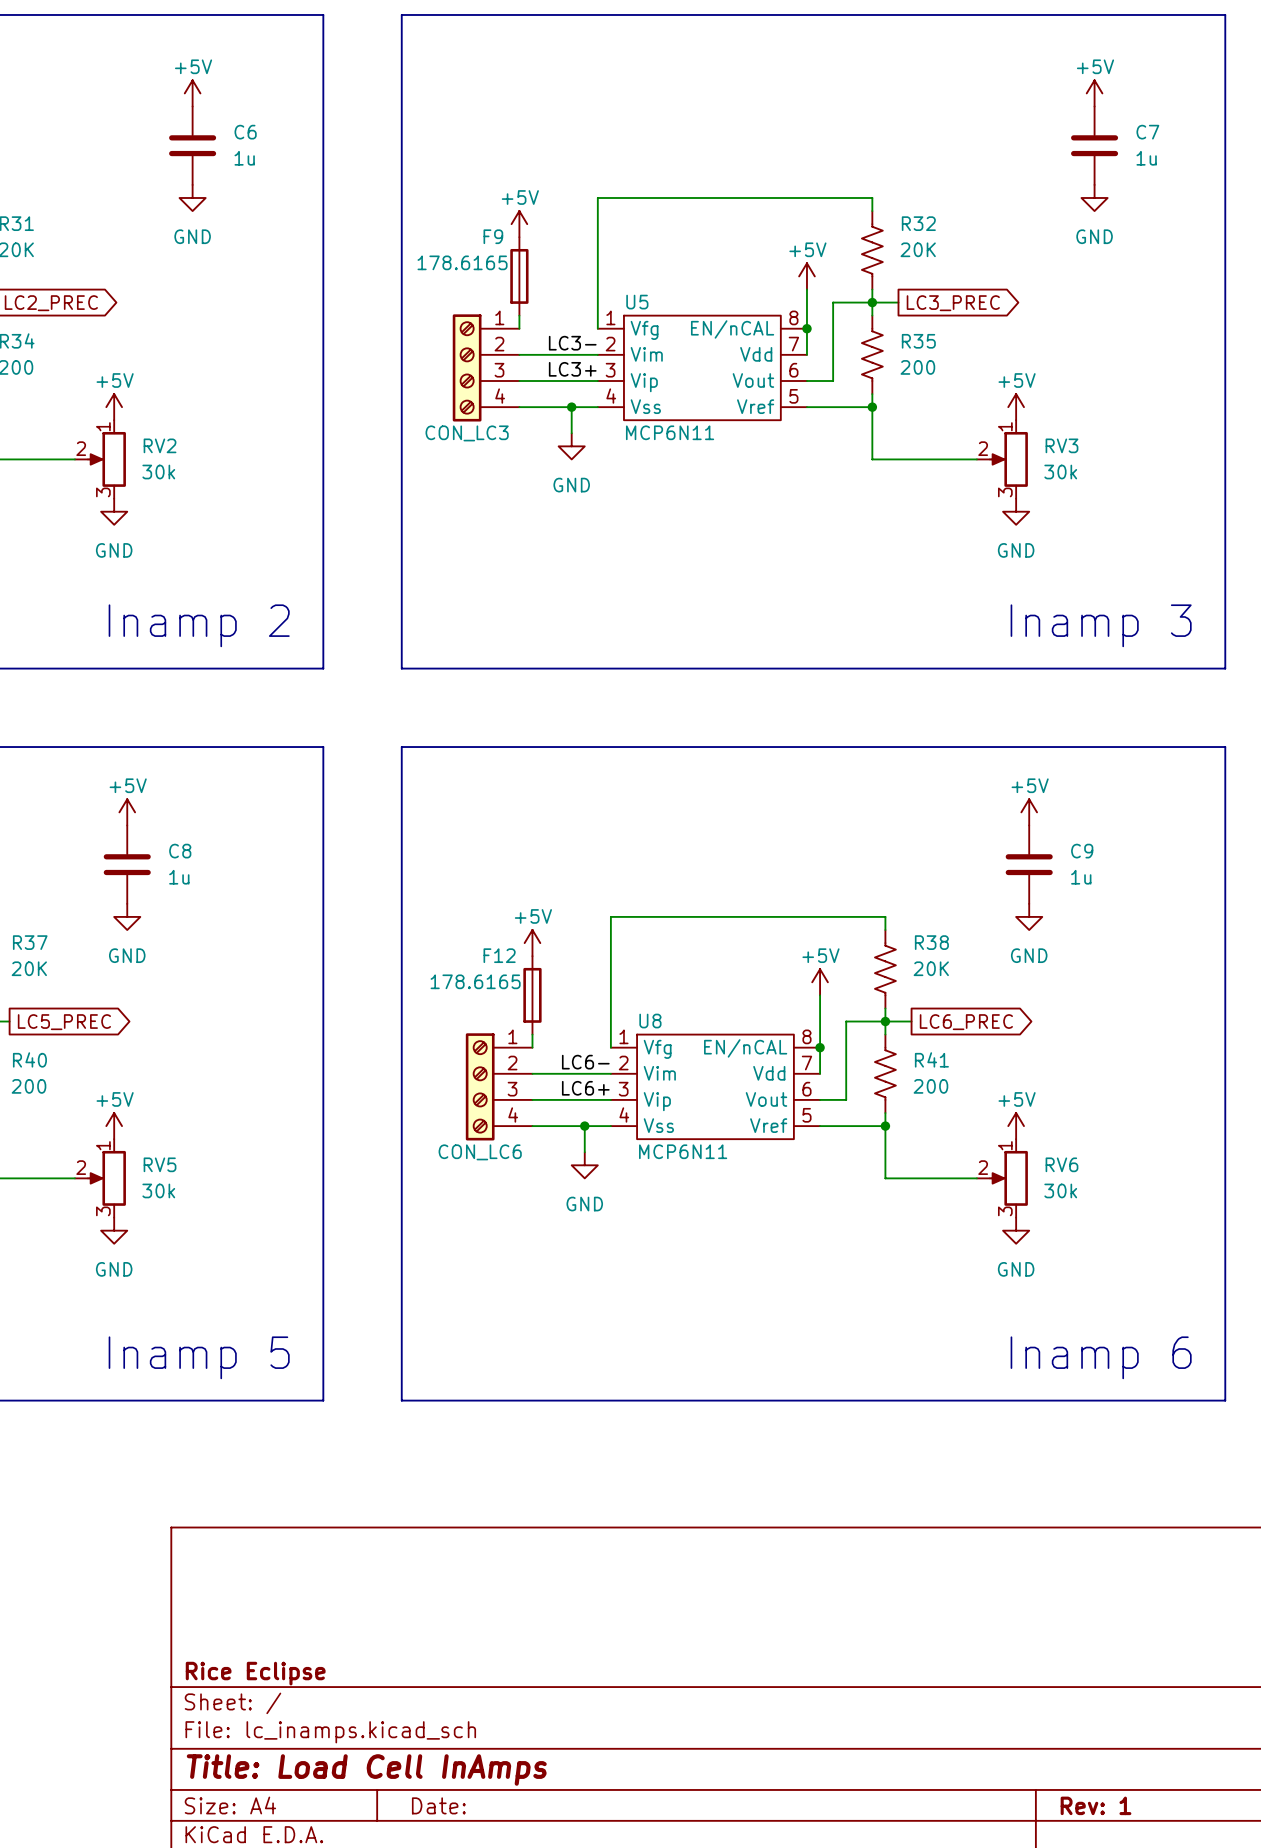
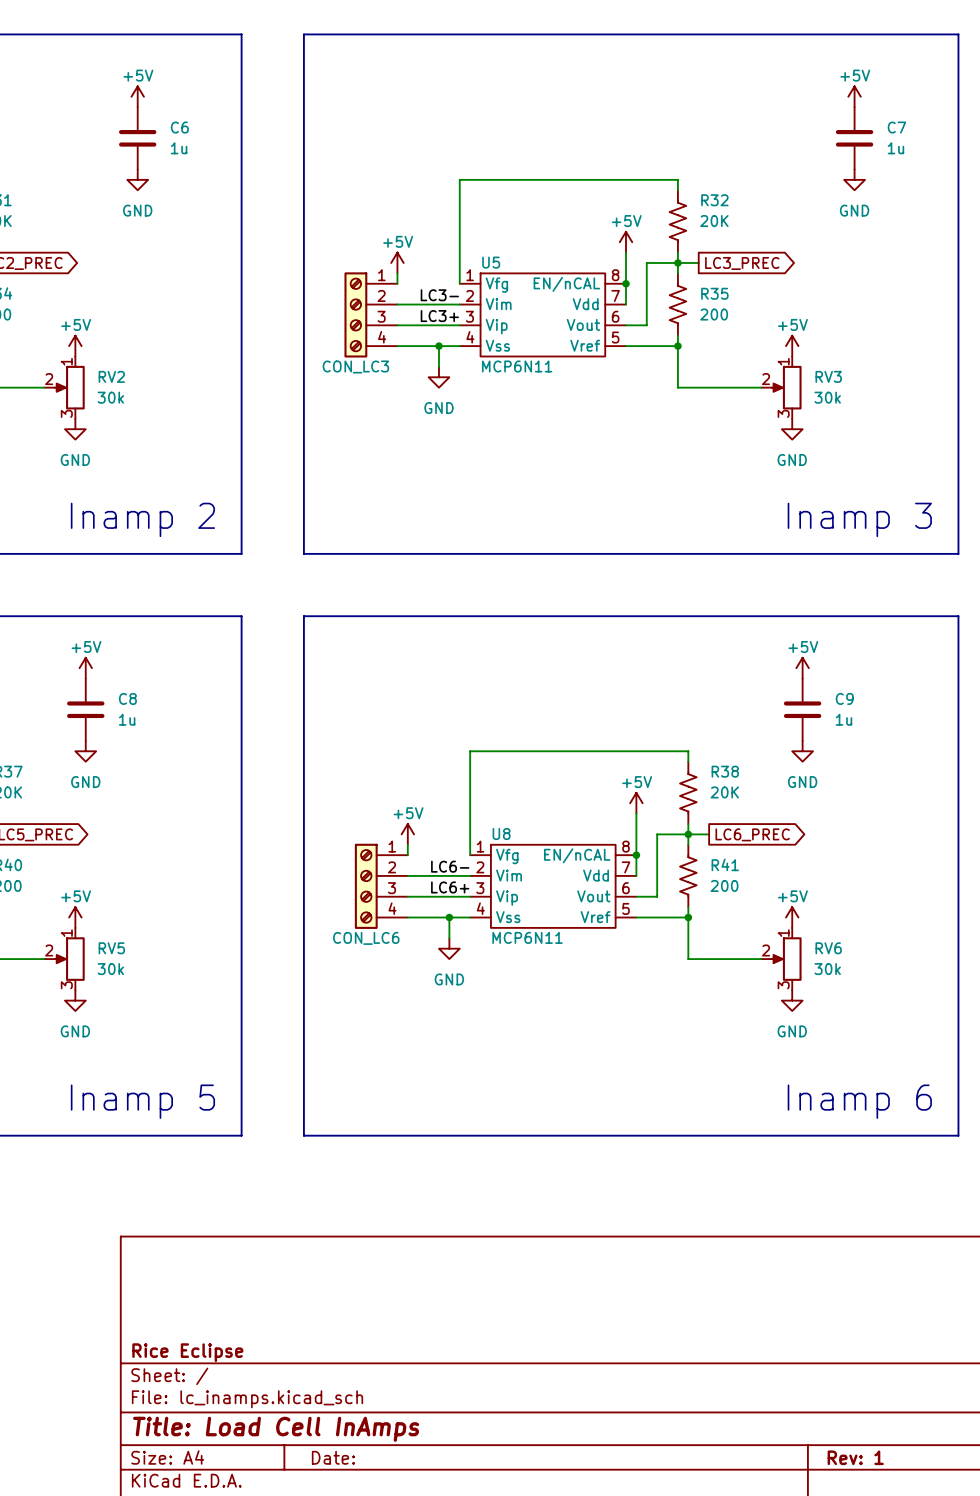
power symbol position: +5V (519, 224) -> +5V (397, 262)
F9: 178.6165 (519, 276) -> none
power symbol position: +5V (532, 943) -> +5V (407, 834)
F12: 178.6165 (532, 995) -> none

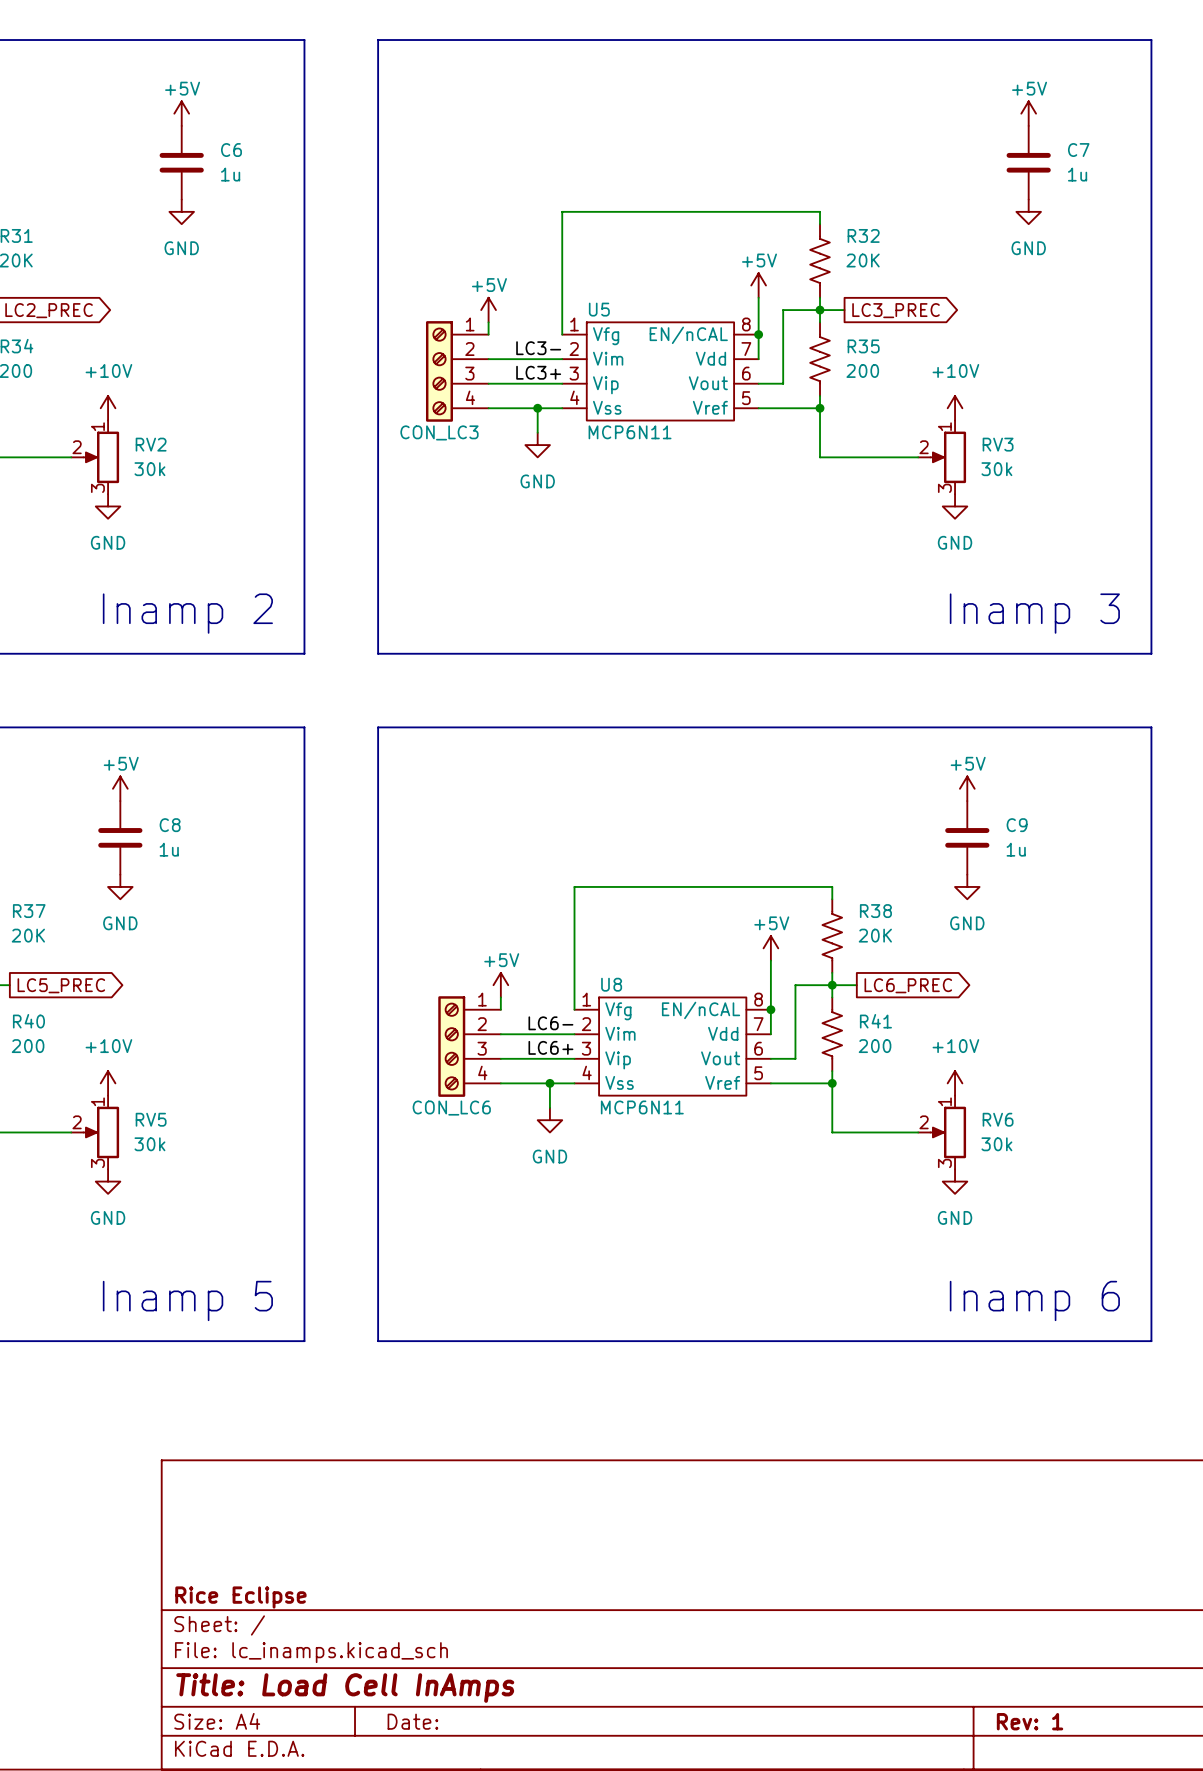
power symbol: +5V (75, 346) -> +10V (108, 408)
power symbol: +5V (792, 346) -> +10V (955, 408)
power symbol: +5V (75, 917) -> +10V (108, 1083)
power symbol: +5V (792, 917) -> +10V (955, 1083)

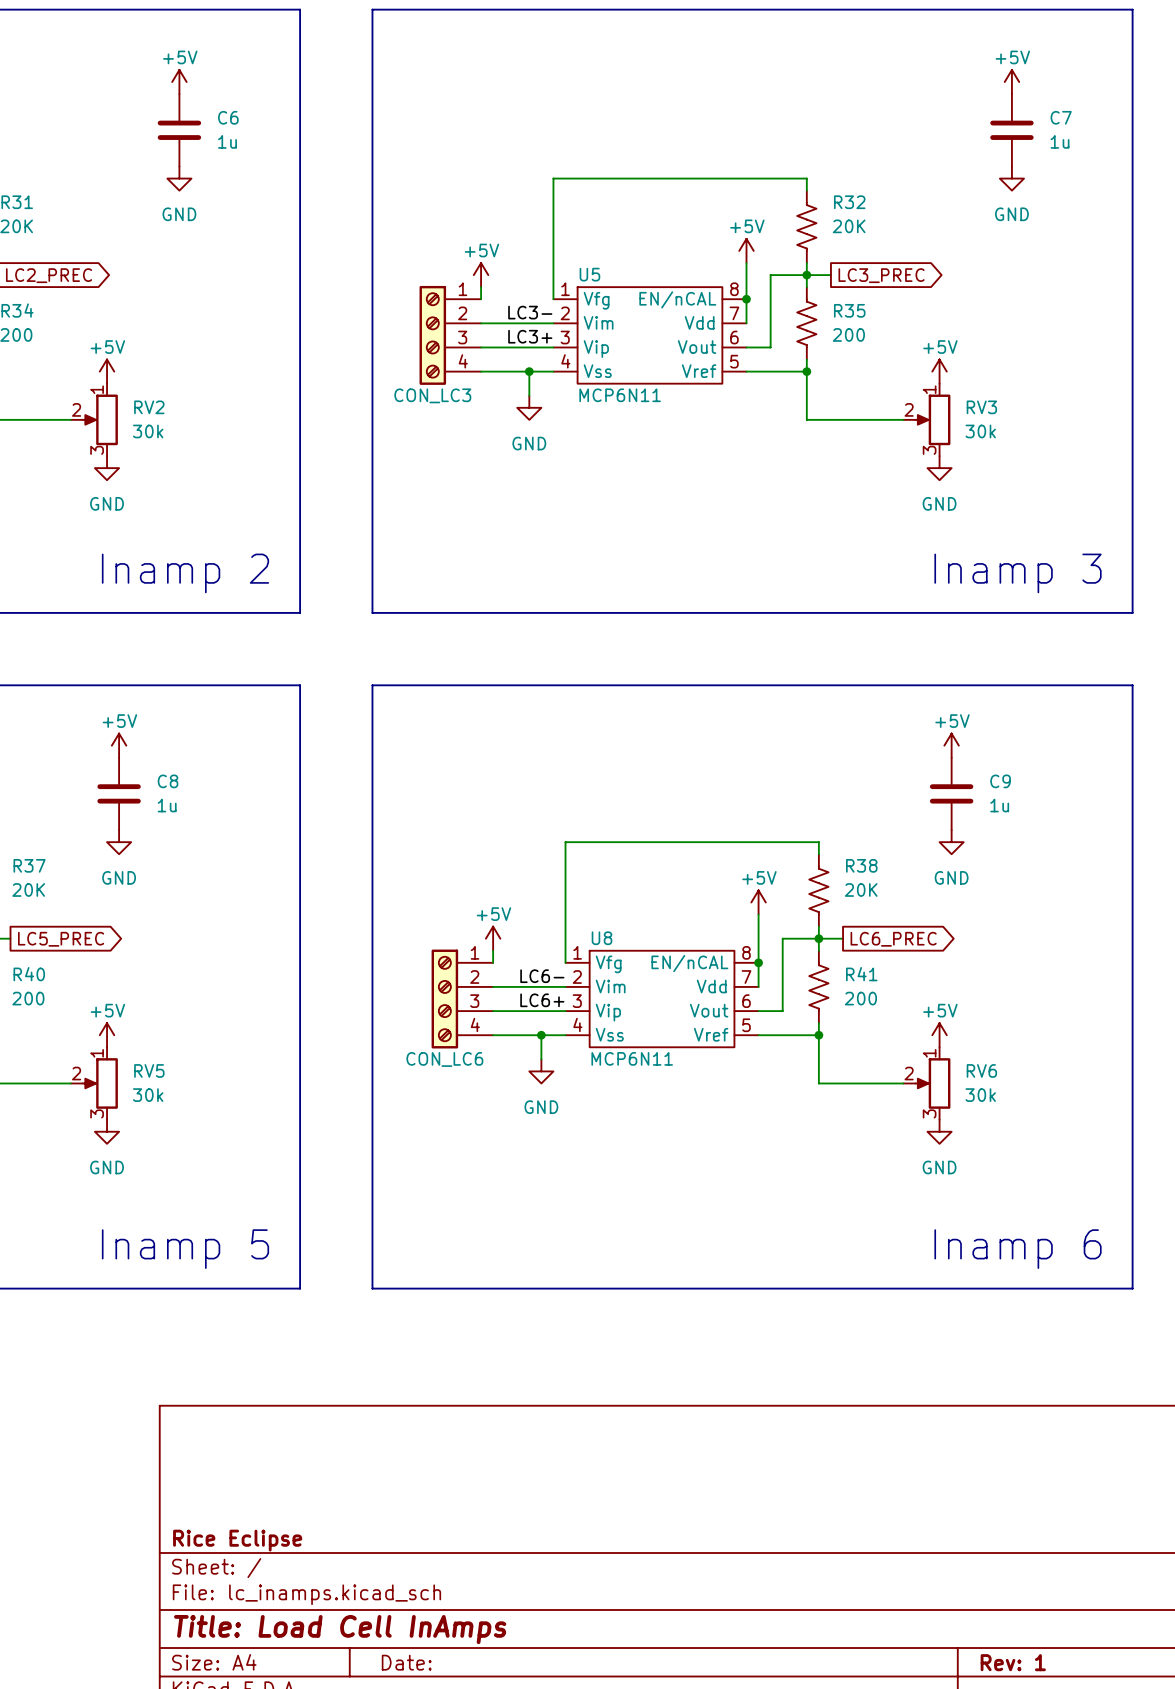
power symbol: +10V (108, 408) -> +5V (107, 371)
power symbol: +10V (955, 408) -> +5V (939, 371)
power symbol: +10V (108, 1083) -> +5V (107, 1035)
power symbol: +10V (955, 1083) -> +5V (939, 1035)

